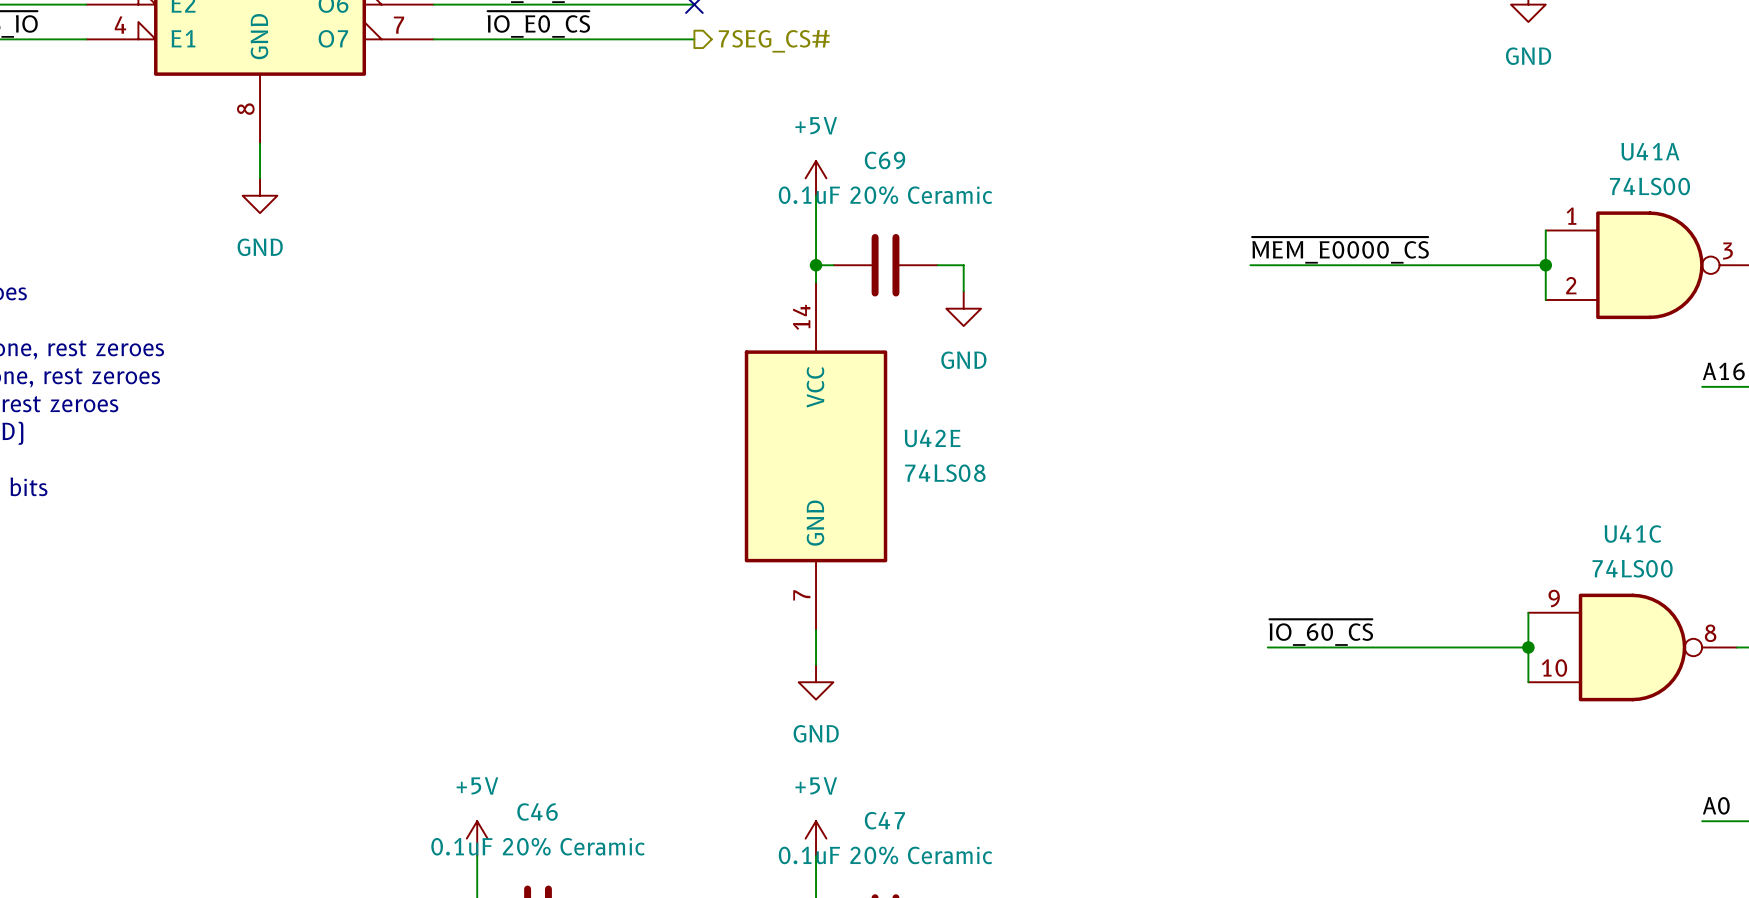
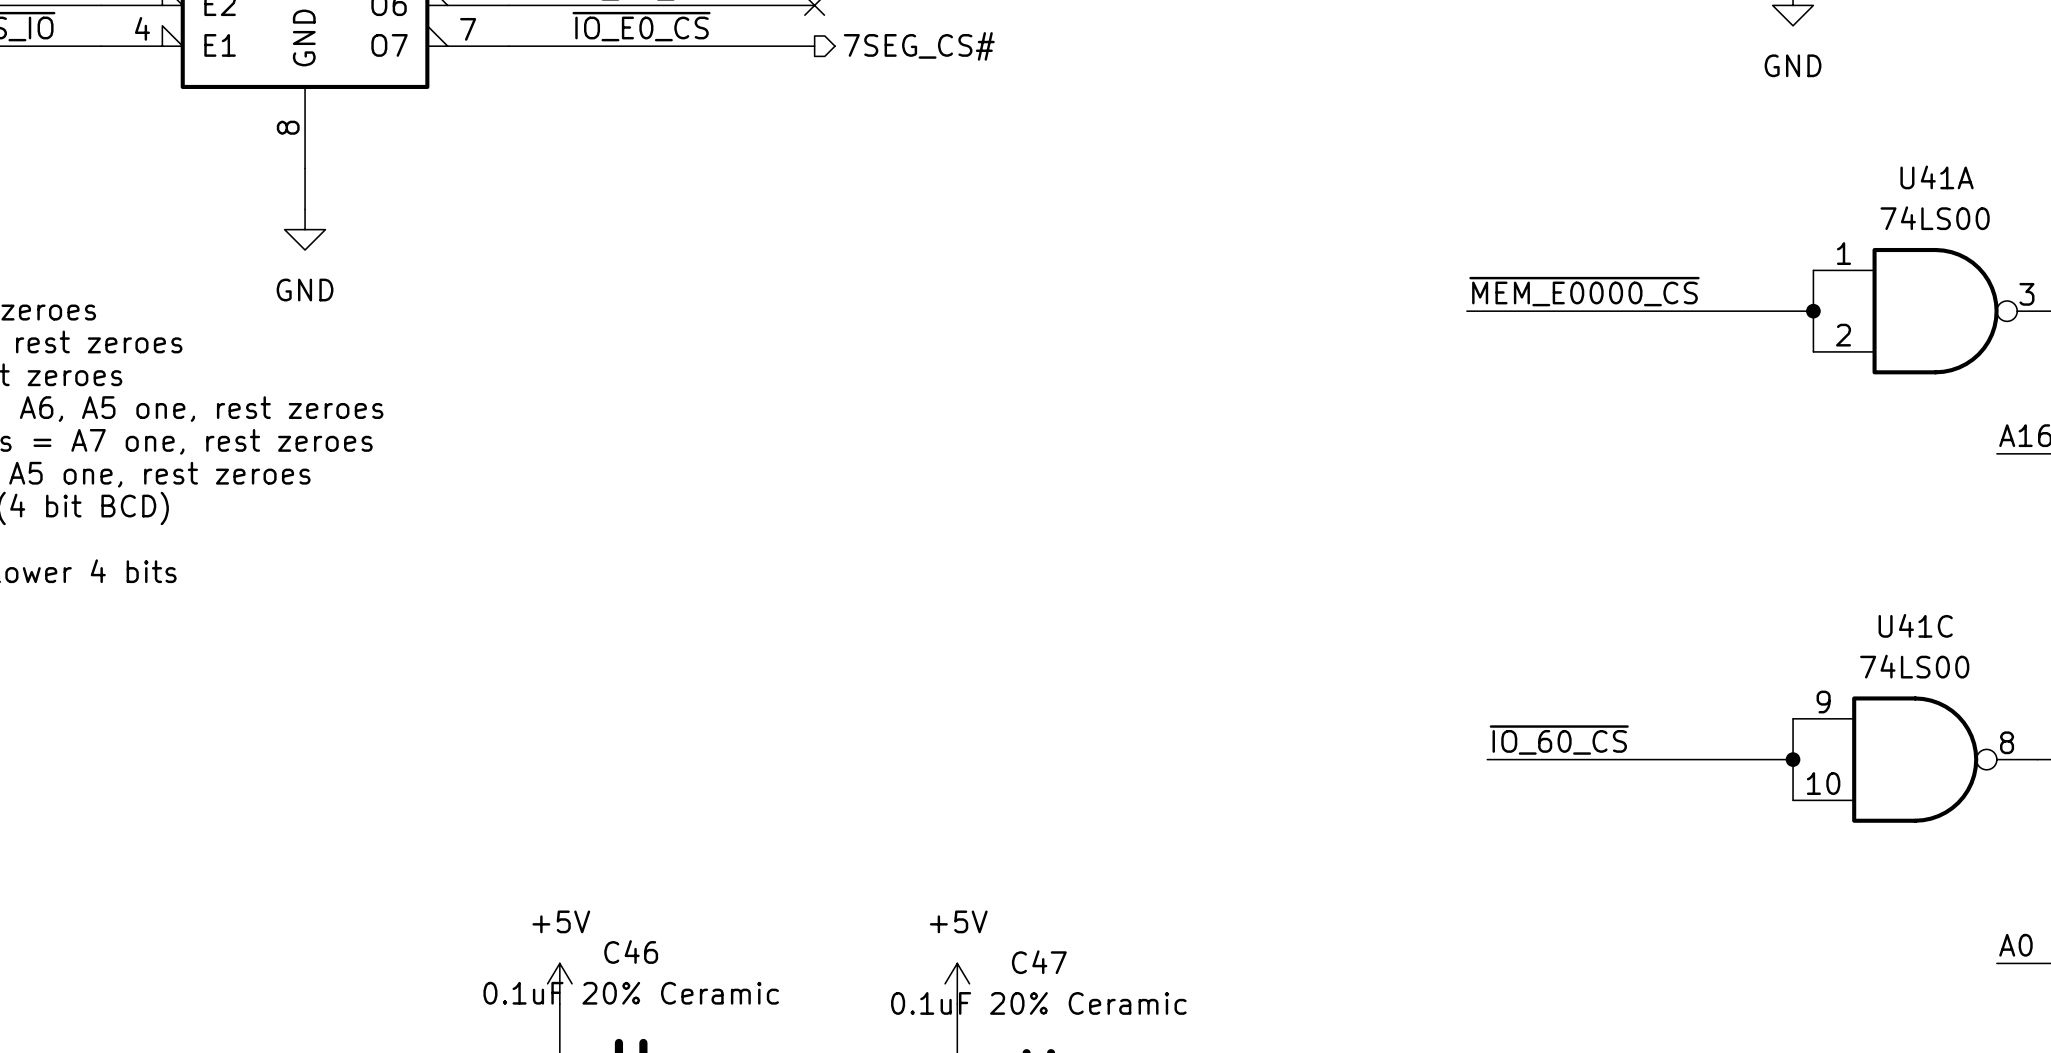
power symbol: +5V (816, 178) -> none
wire: (816, 195) (816, 282) -> none
wire: (816, 265) (833, 265) -> none
junction: (816, 265) -> none
C69: 0.1uF 20% Ceramic (885, 265) -> none
wire: (937, 265) (963, 265) (963, 291) -> none
power symbol: GND (963, 308) -> none
U42E: 74LS08 (816, 456) -> none
wire: (816, 630) (816, 664) -> none
power symbol: GND (816, 682) -> none

